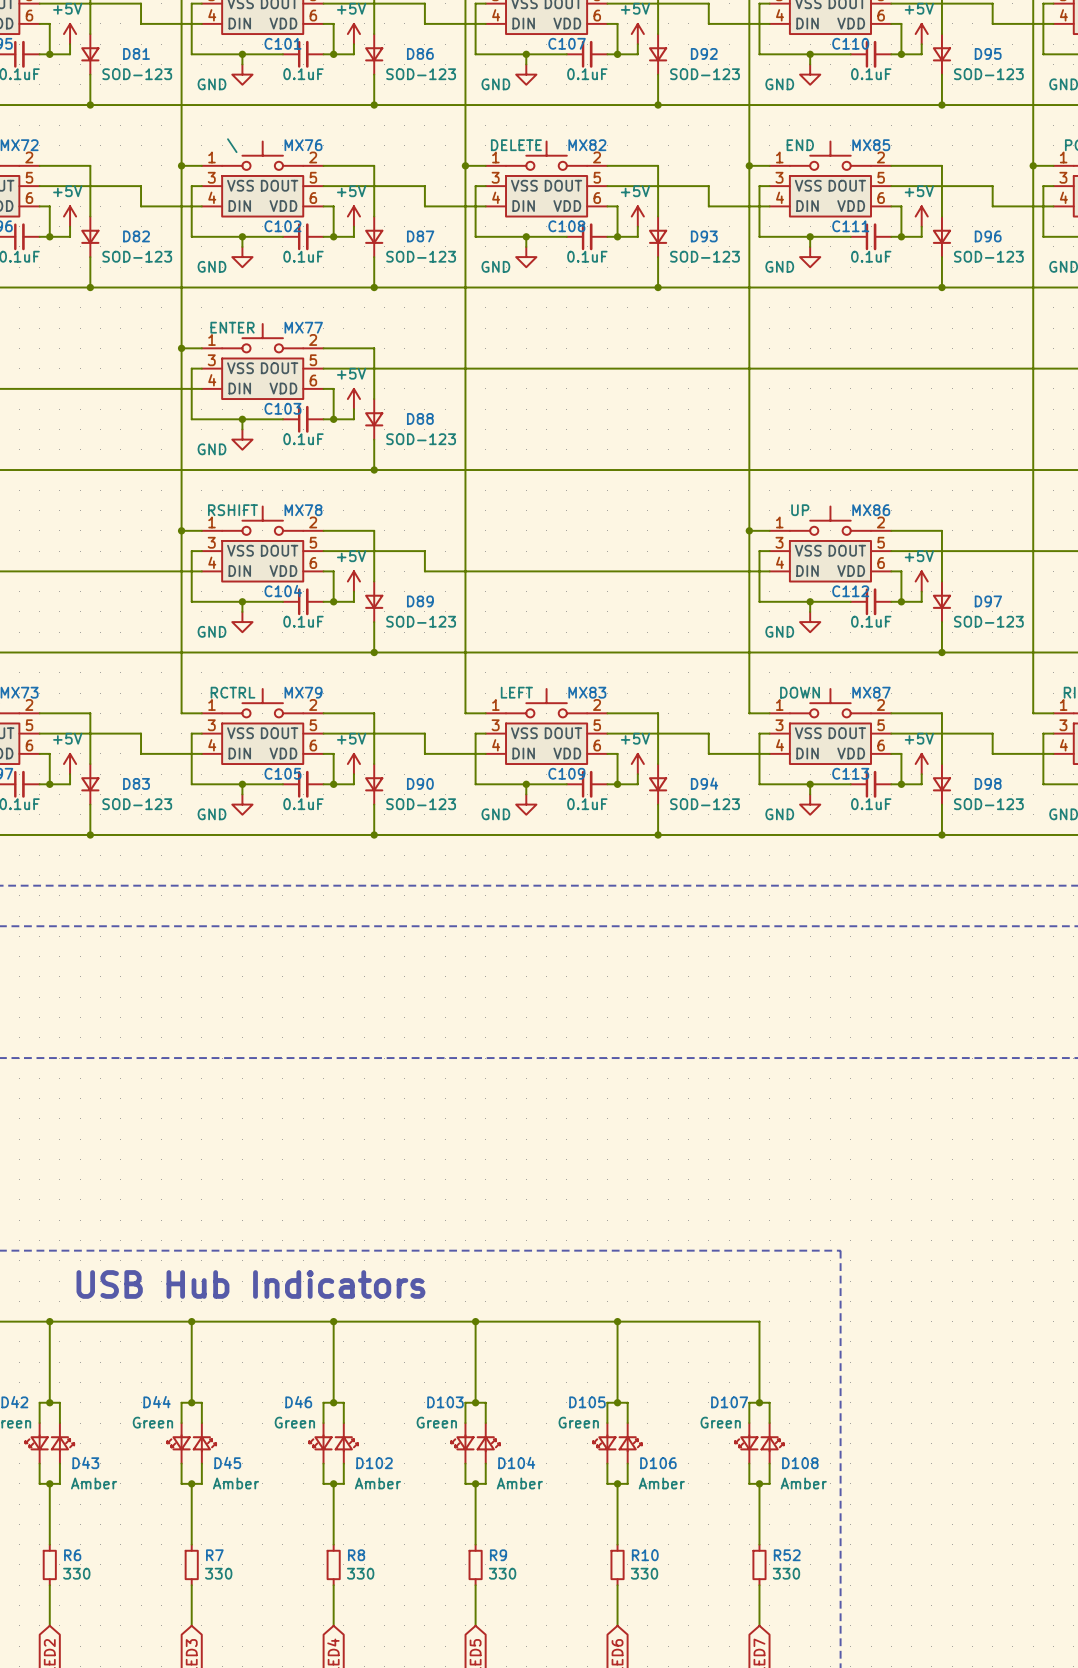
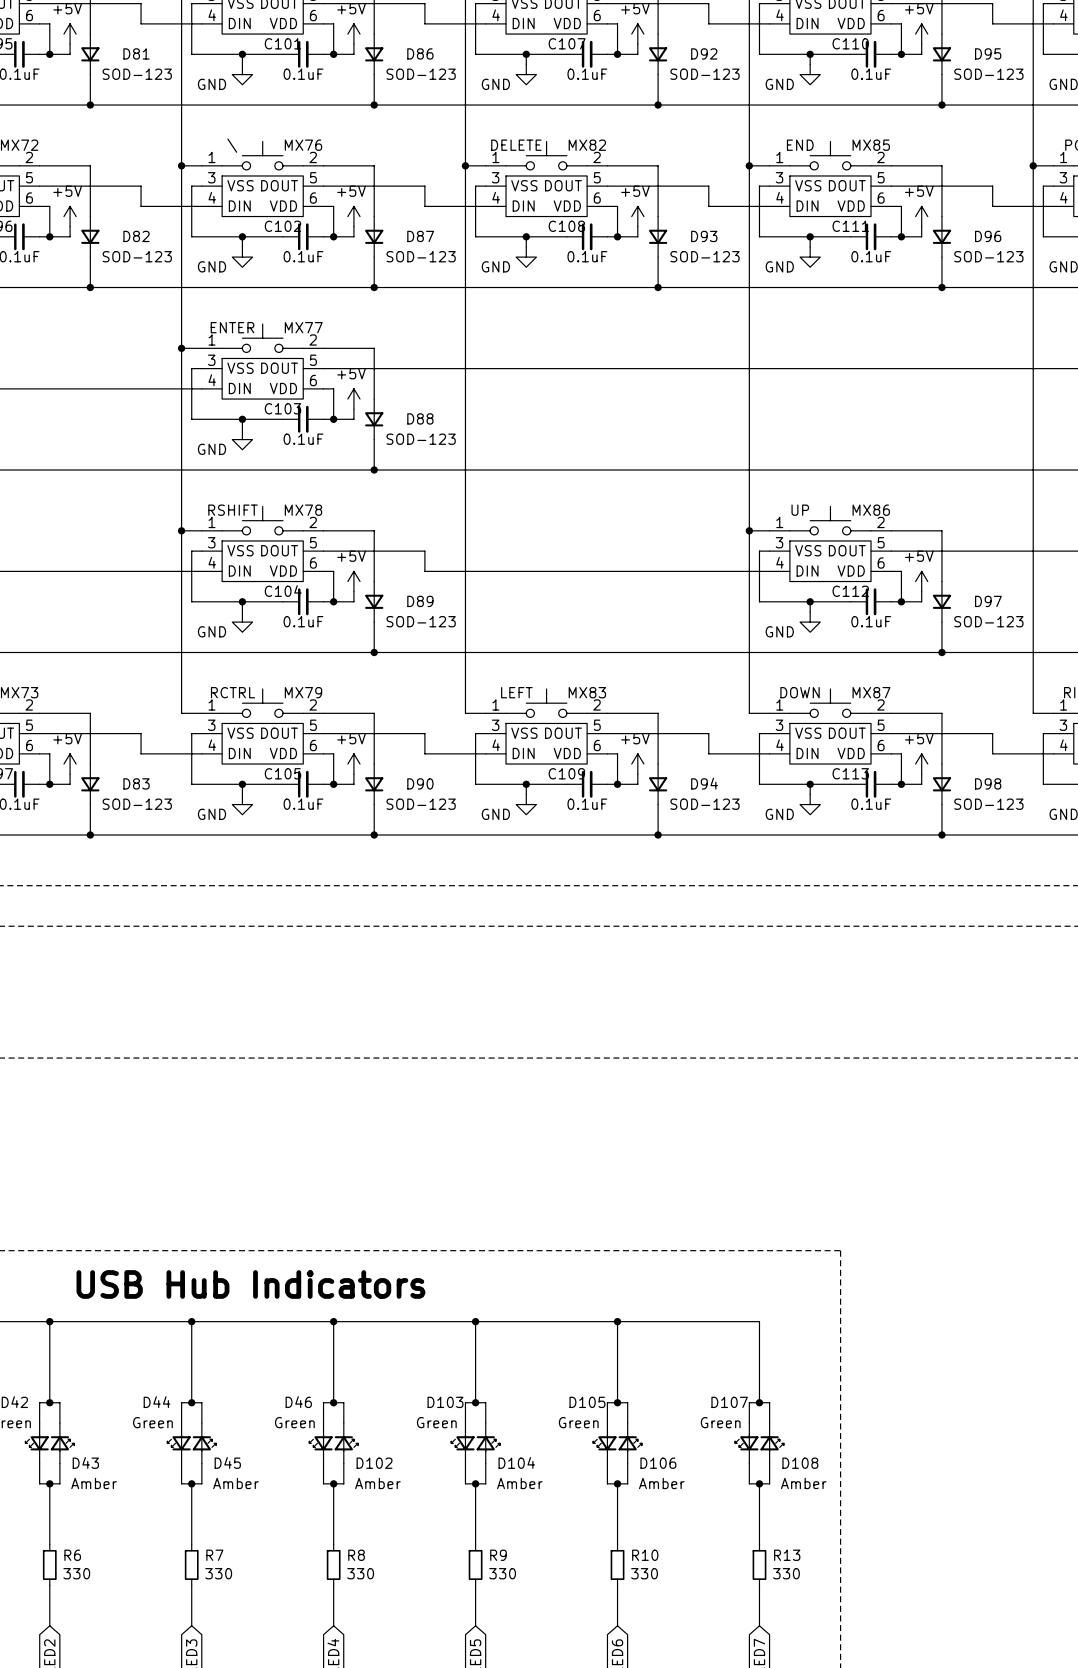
R52 name: R52 (787, 1555) -> R13 (787, 1555)

